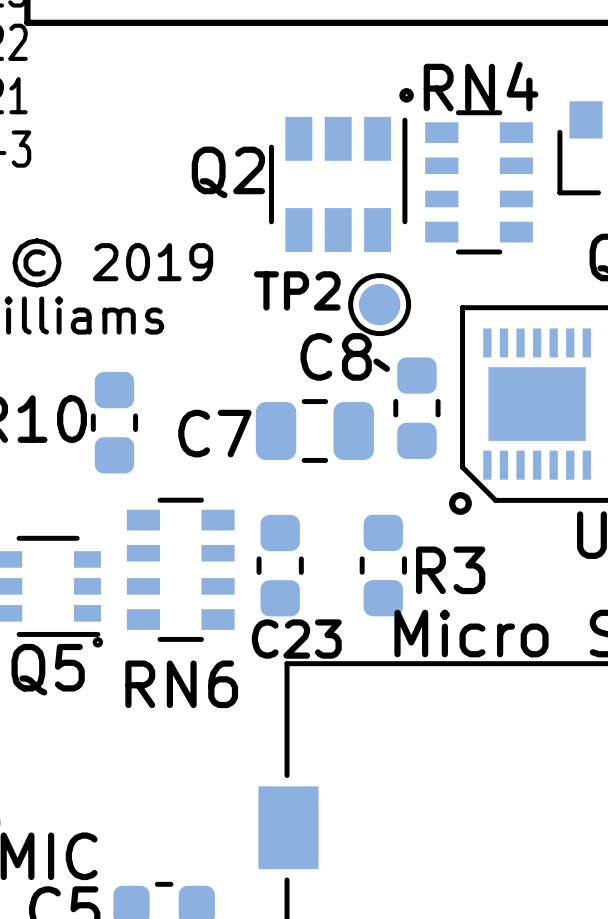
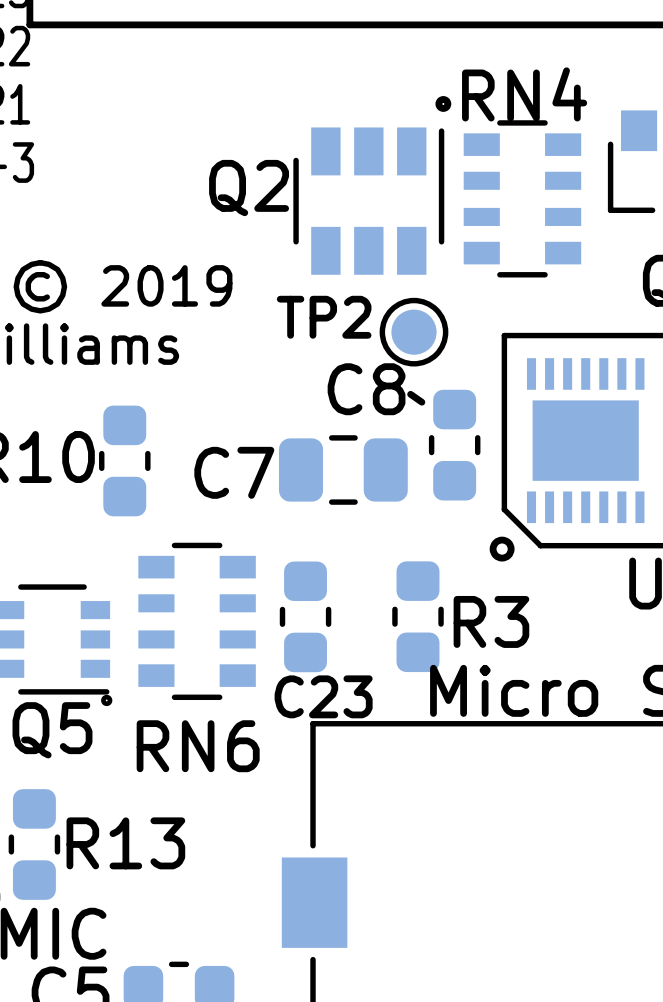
R13: none -> (34, 844)

